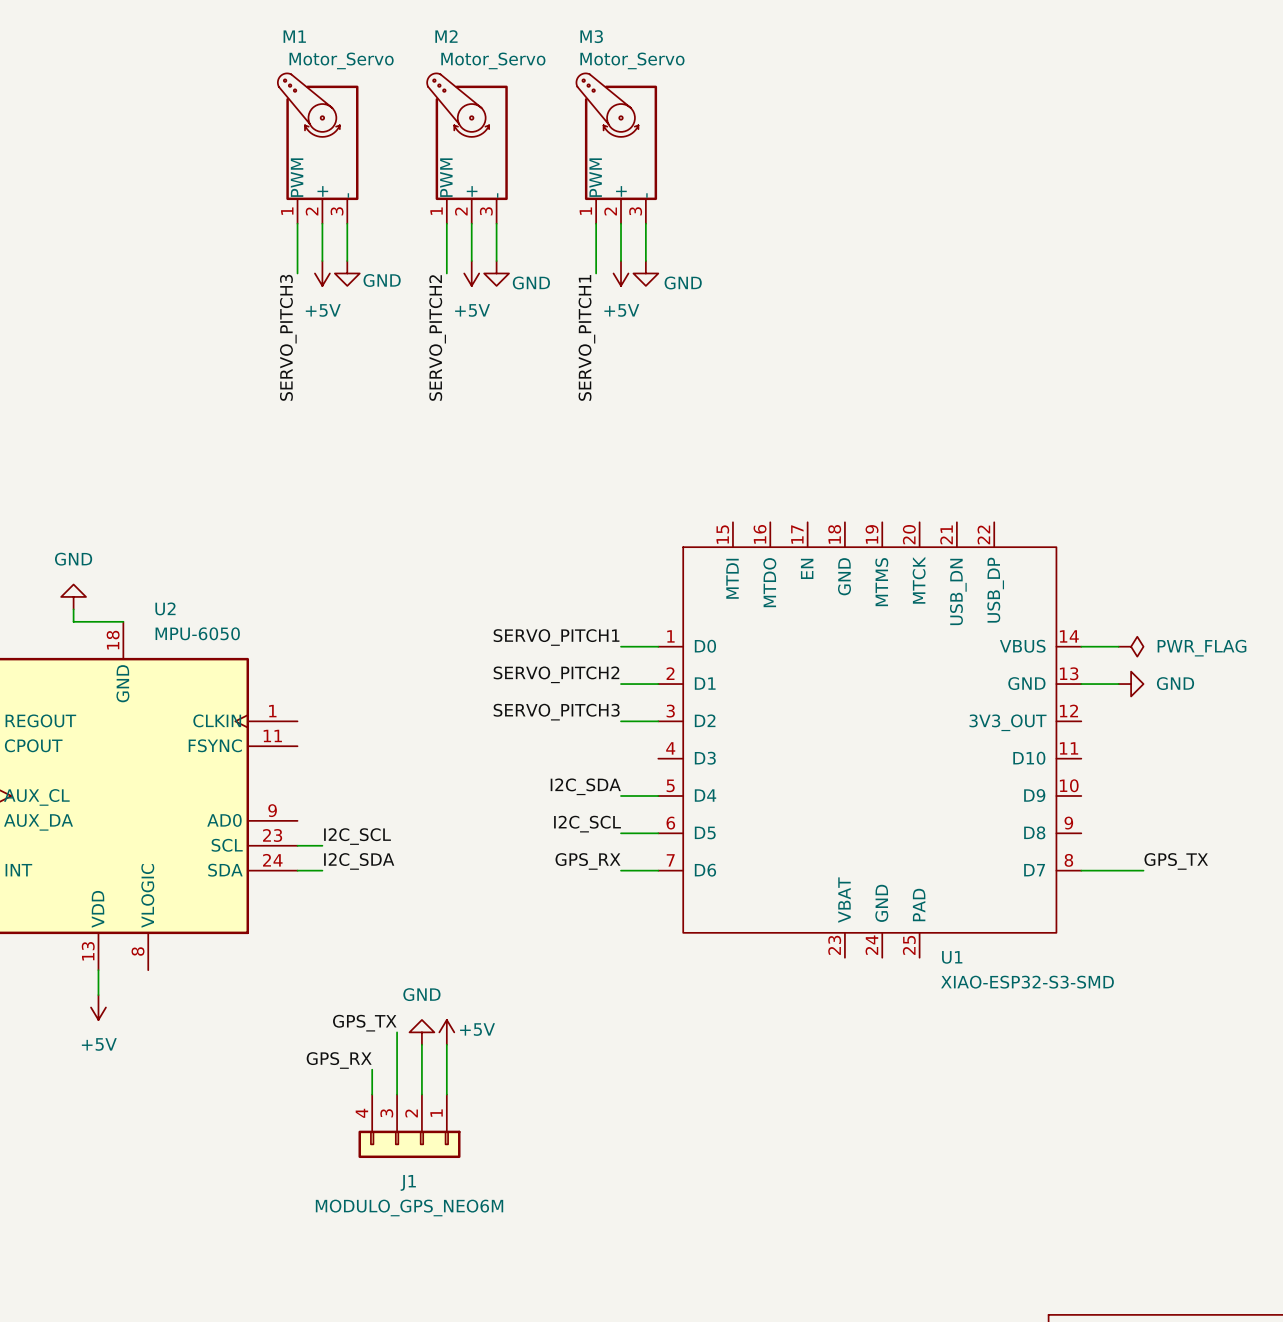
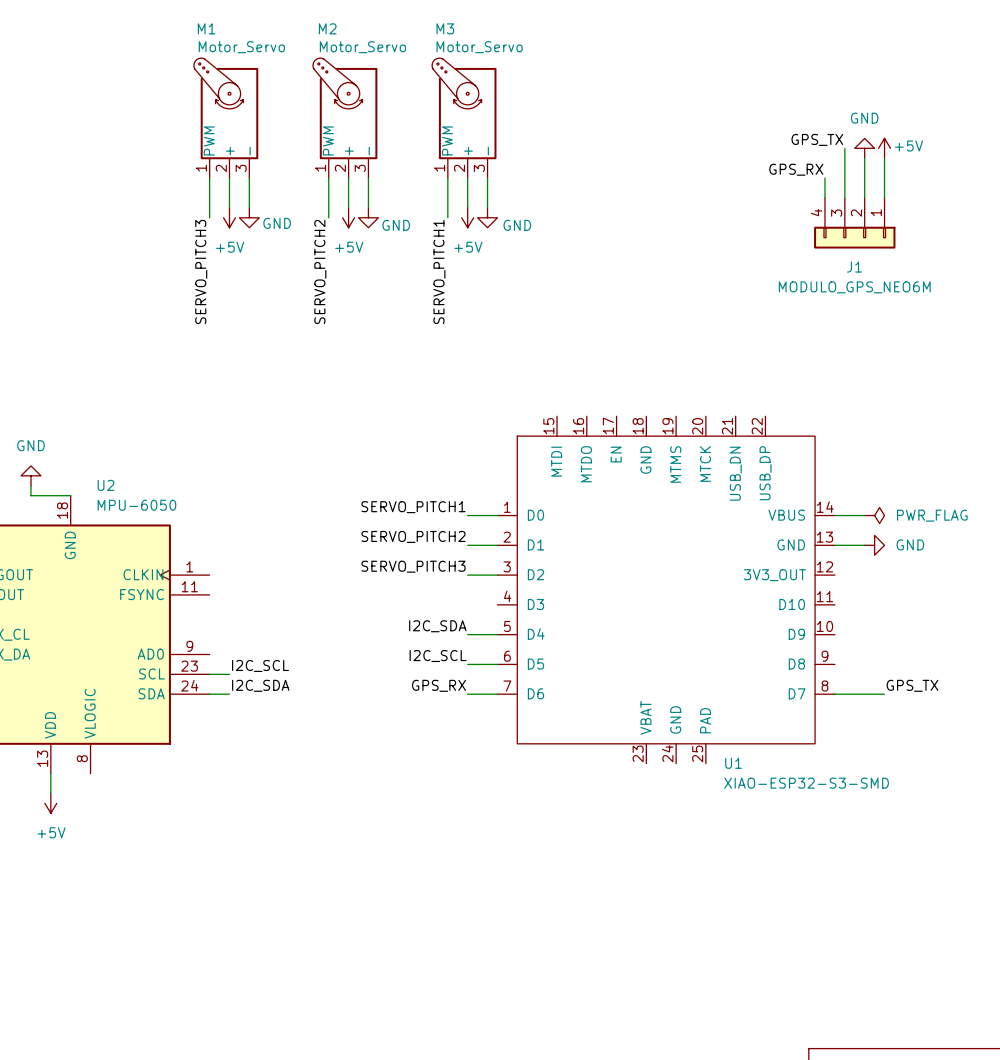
label: none -> GPS_TX (817, 139)
wire: none -> (844, 148) (844, 197)
power symbol: none -> GND (864, 148)
power symbol: none -> +5V (884, 148)
wire: none -> (864, 158) (864, 197)
wire: none -> (884, 158) (884, 197)
label: none -> GPS_RX (796, 169)
wire: none -> (824, 178) (824, 197)
label: GPS_TX (364, 1023) -> none
wire: (397, 1032) (397, 1094) -> none
power symbol: GND (421, 1032) -> none
power symbol: +5V (446, 1032) -> none
wire: (421, 1044) (421, 1094) -> none
wire: (446, 1044) (446, 1094) -> none
label: GPS_RX (339, 1060) -> none
wire: (372, 1069) (372, 1094) -> none
J1 position: (409, 1126) -> (854, 223)

